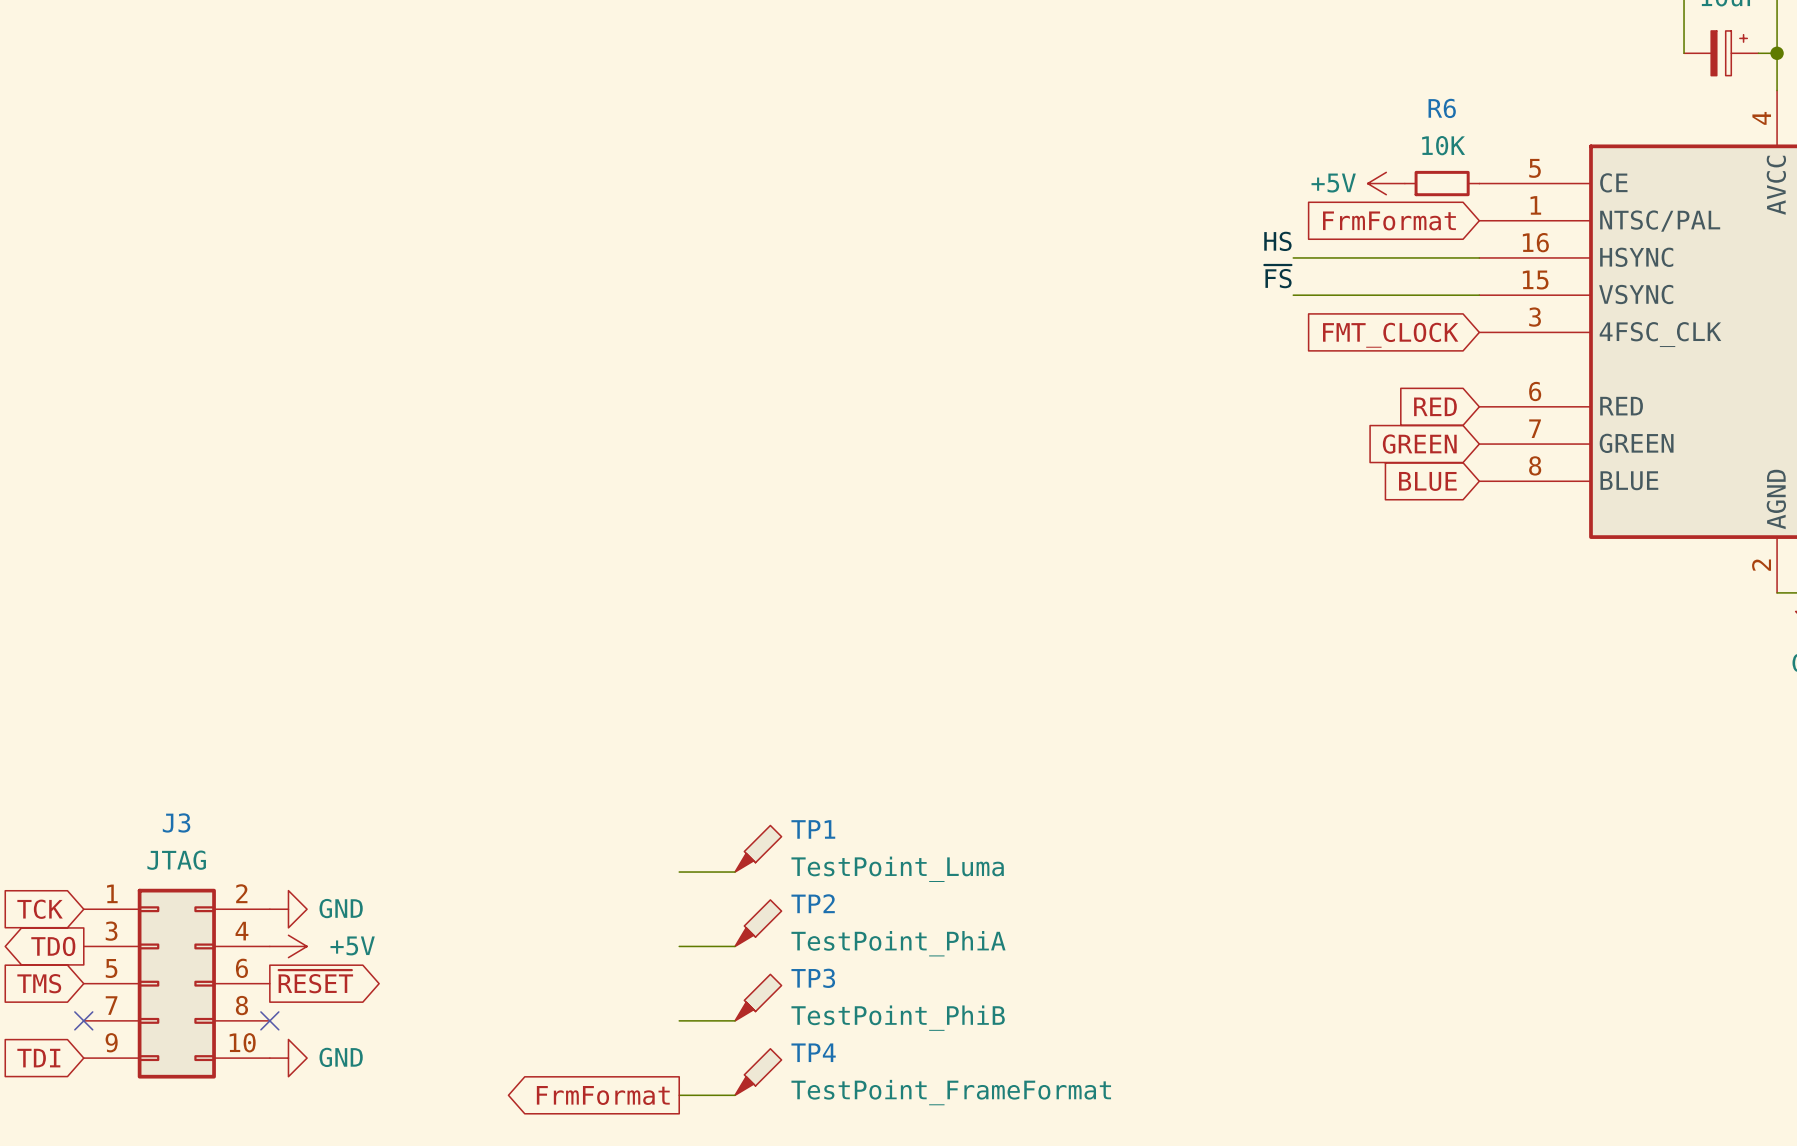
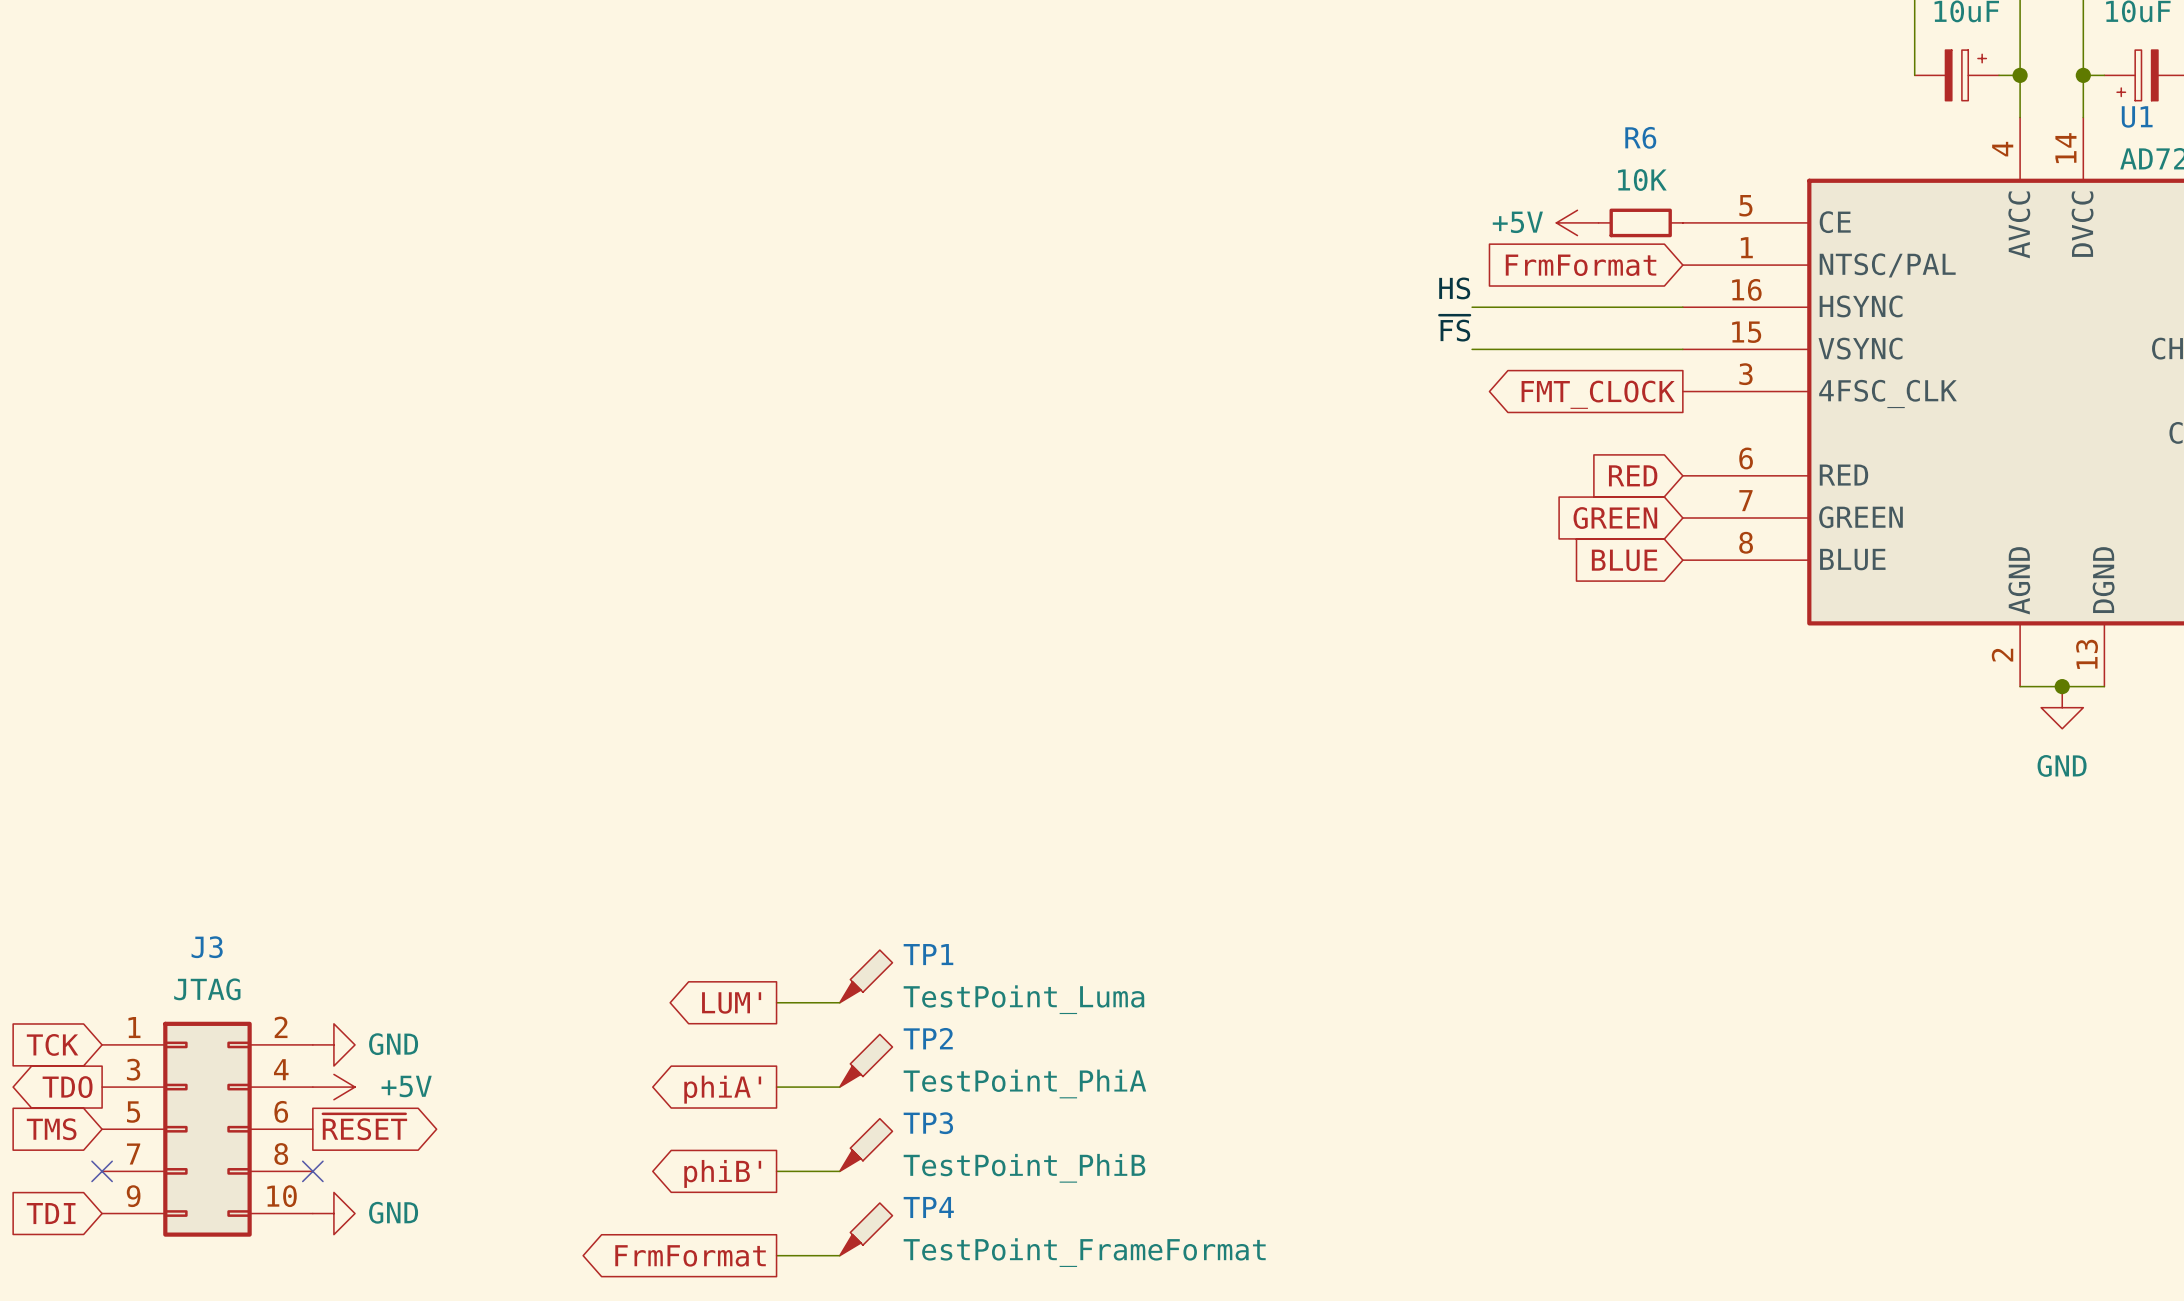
global label shape: input (1390, 335) -> output (1598, 394)
global label: none -> LUM' (731, 1002)
global label: none -> phiA' (722, 1089)
global label: none -> phiB' (722, 1173)

